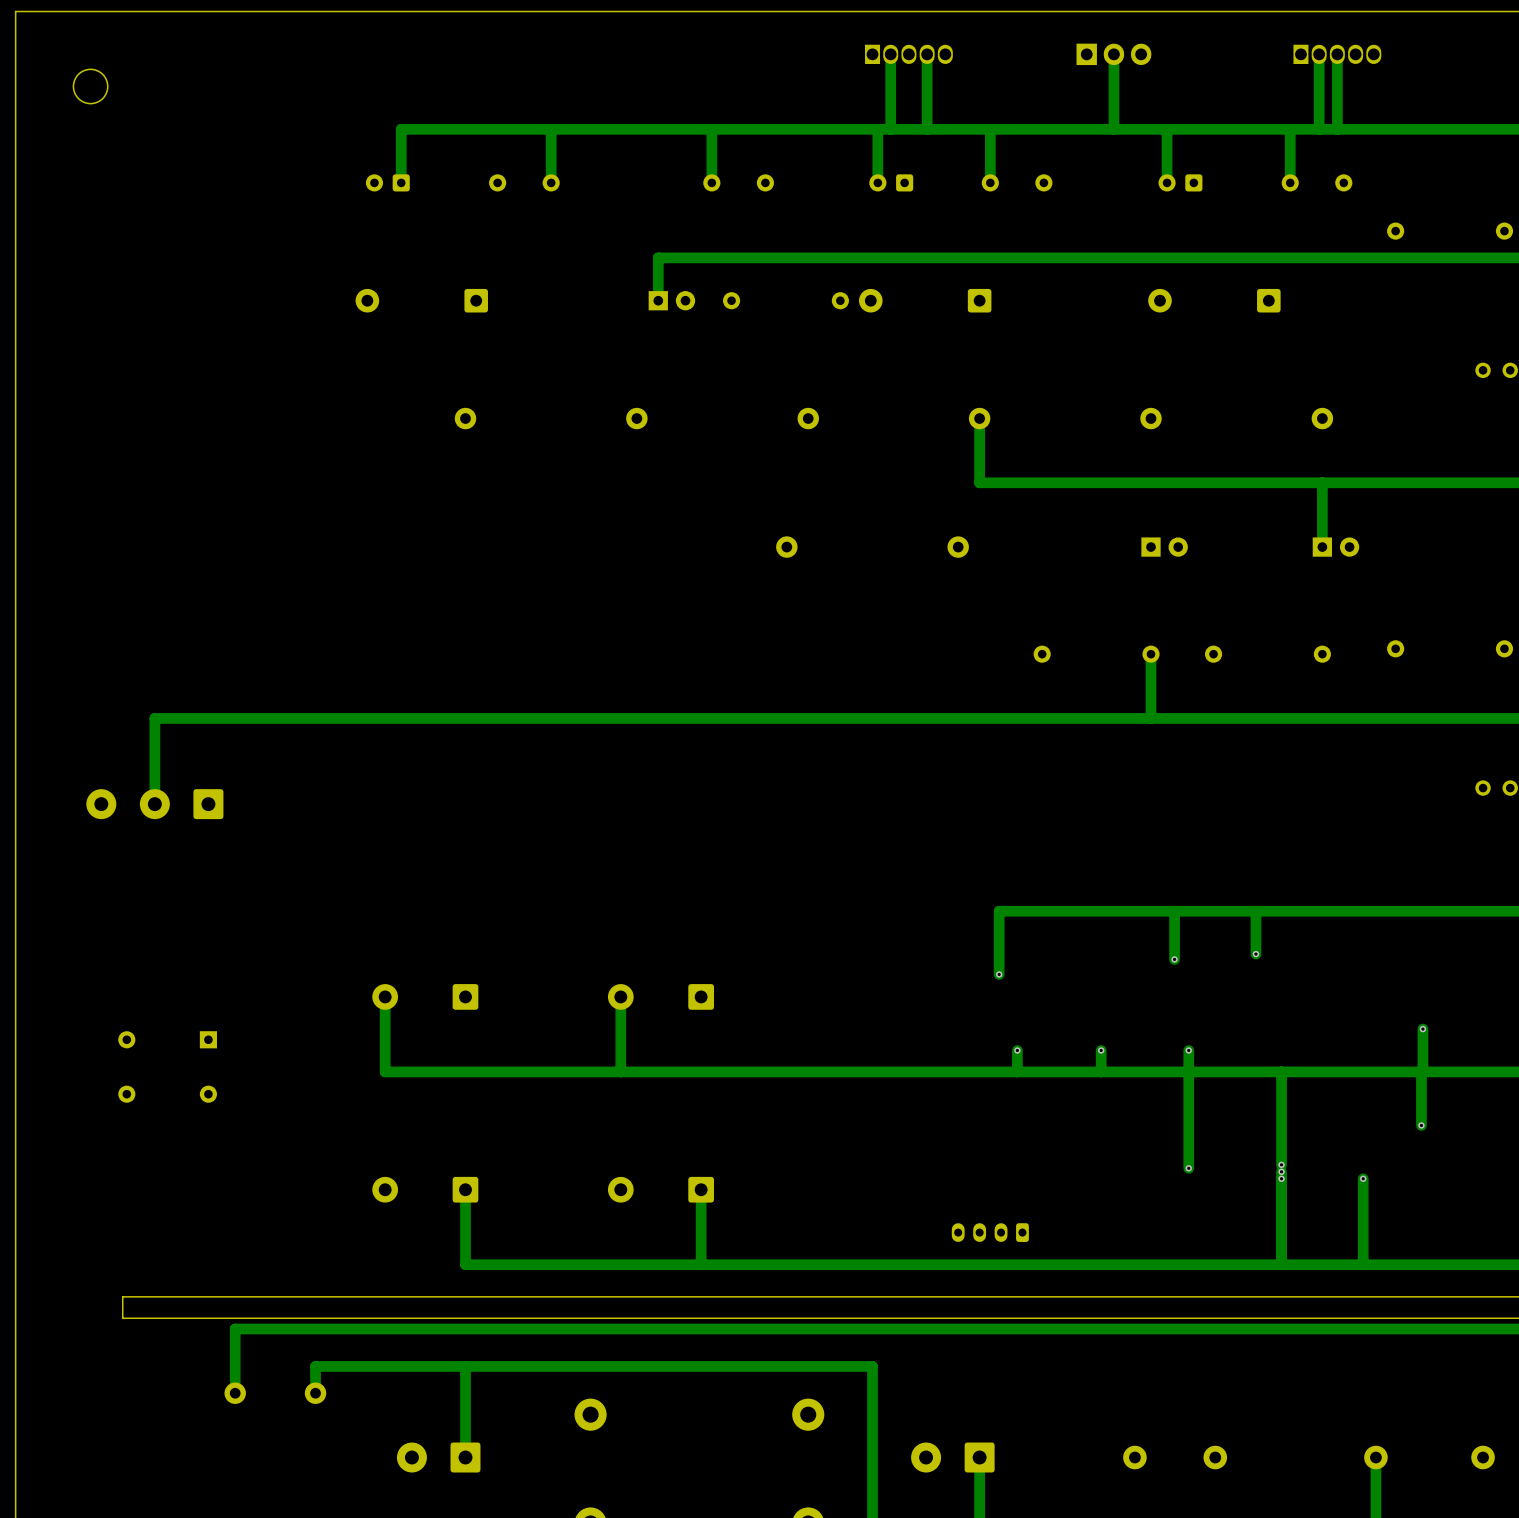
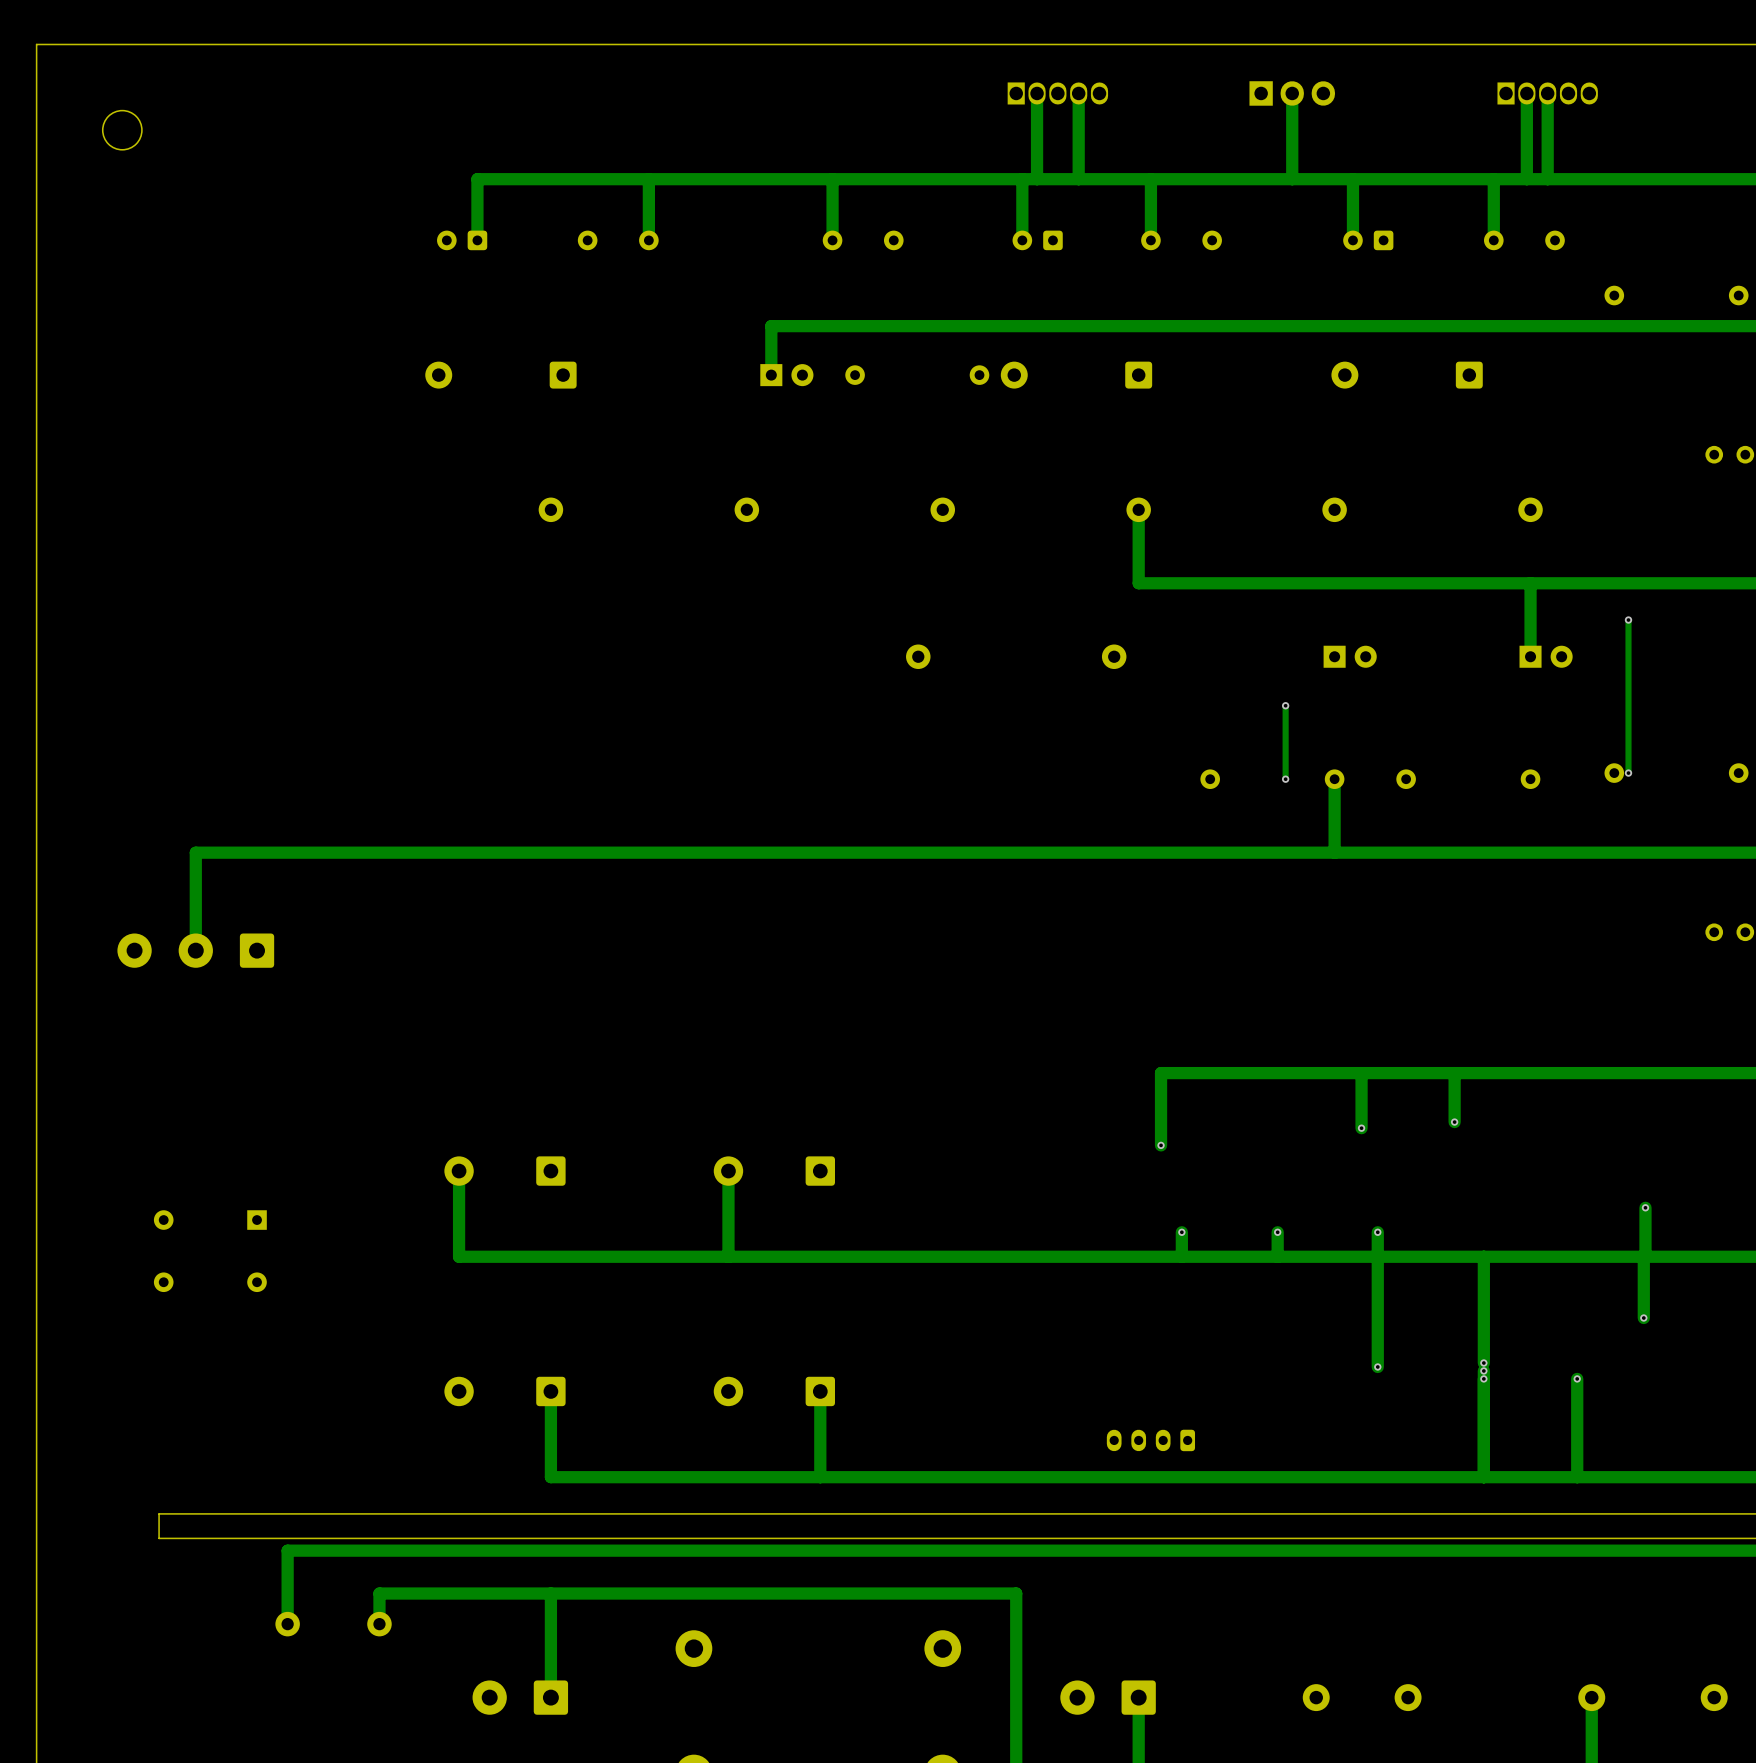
track: none -> (1628, 620) (1628, 773)
via: none -> (1628, 620)
track: none -> (1285, 705) (1285, 779)
via: none -> (1285, 705)
via: none -> (1628, 773)
via: none -> (1285, 779)

